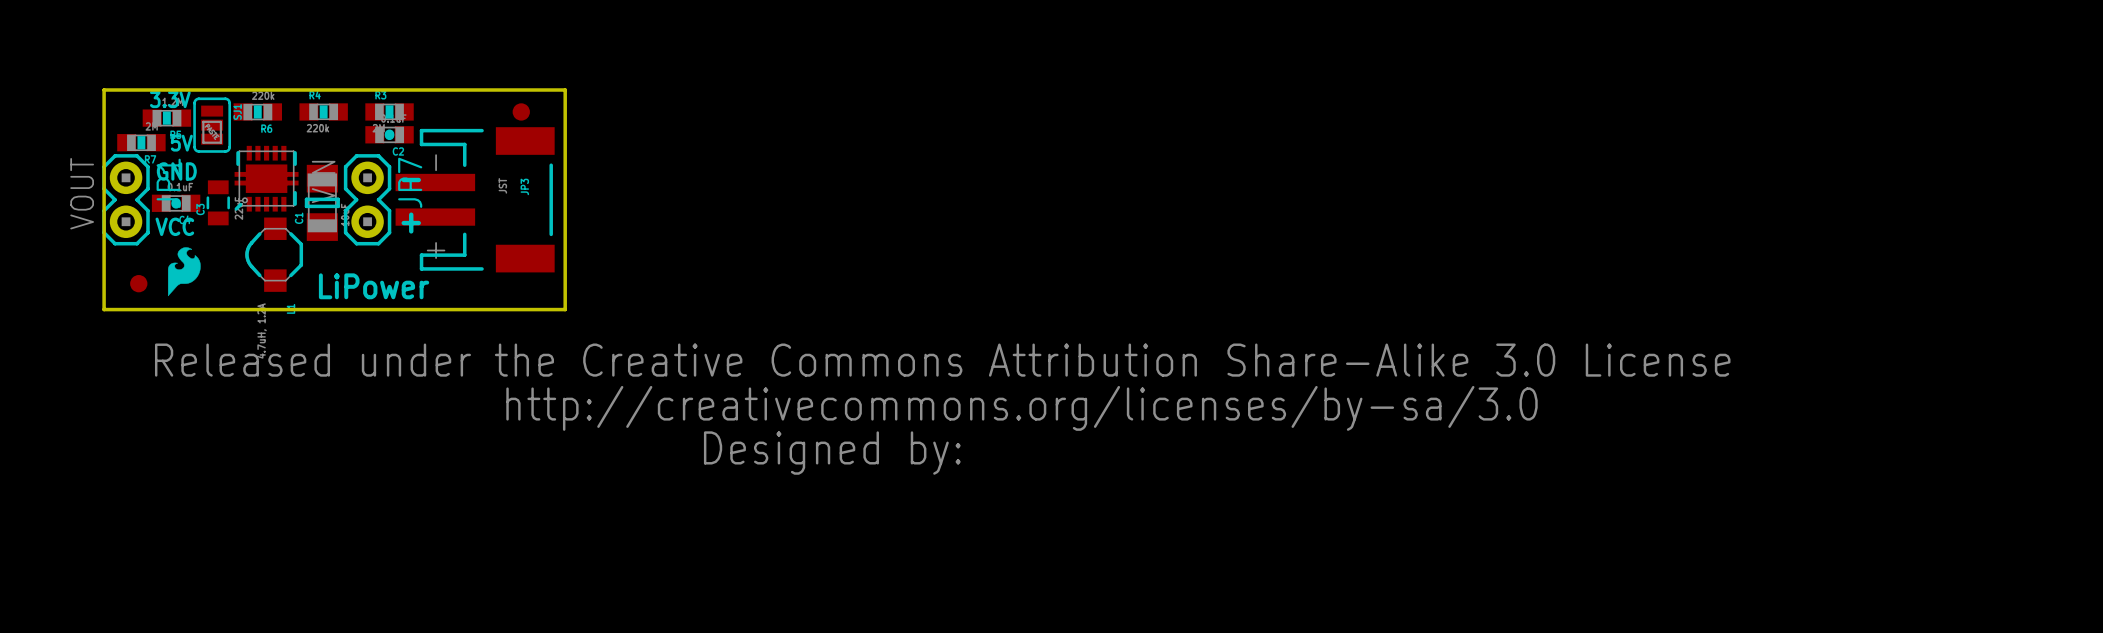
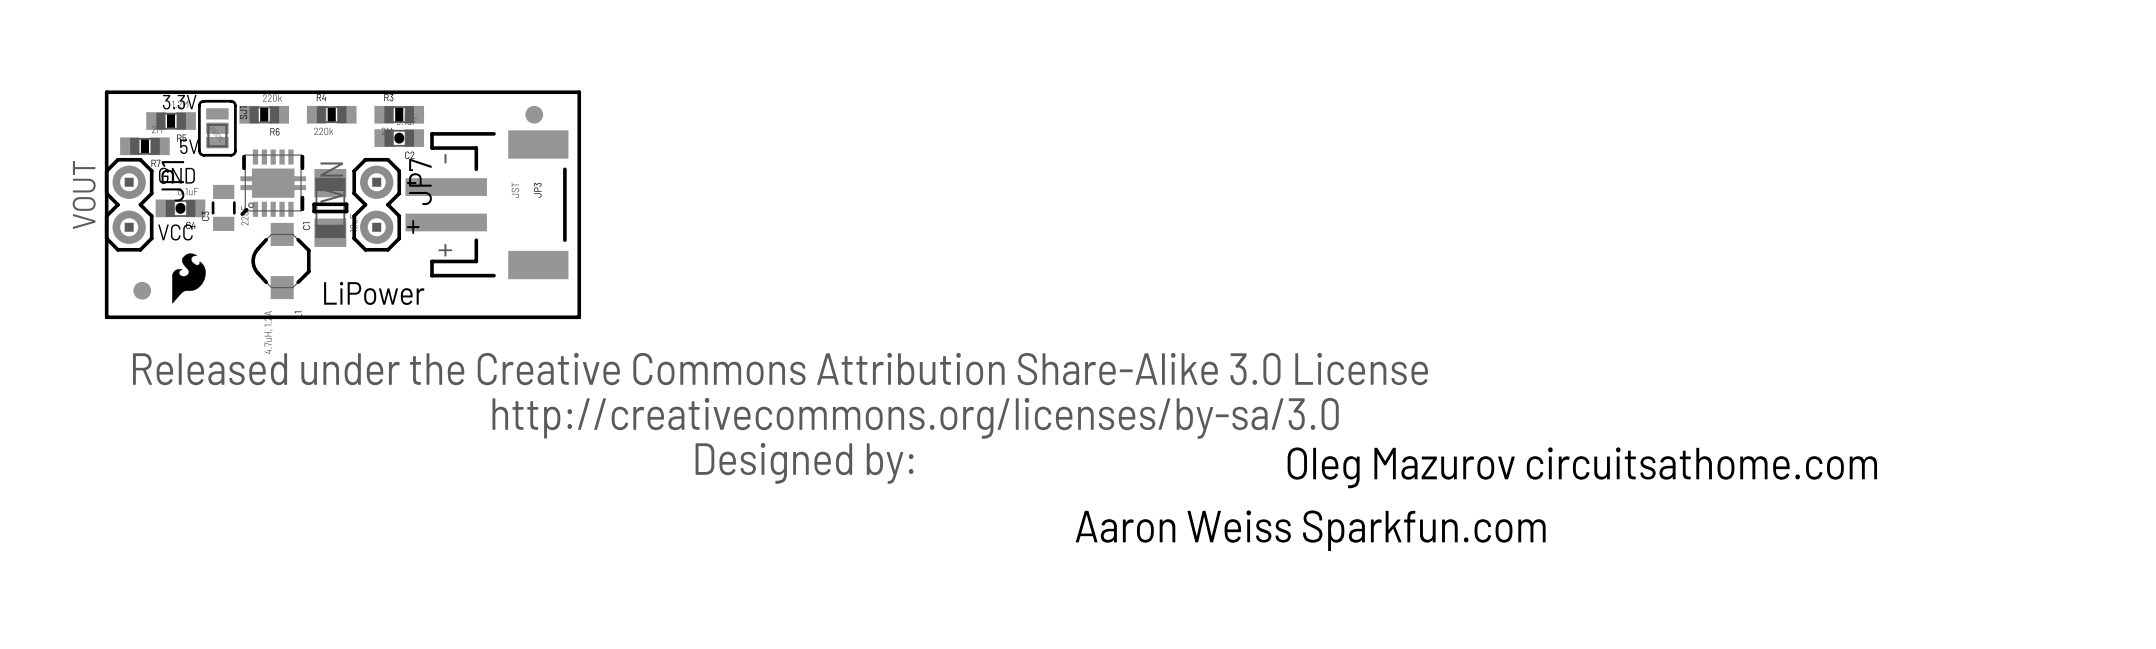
drawing position: (942, 409) -> (780, 418)
text: none -> Oleg Mazurov circuitsathome.com (1582, 467)
text: none -> Aaron Weiss Sparkfun.com (1310, 530)

